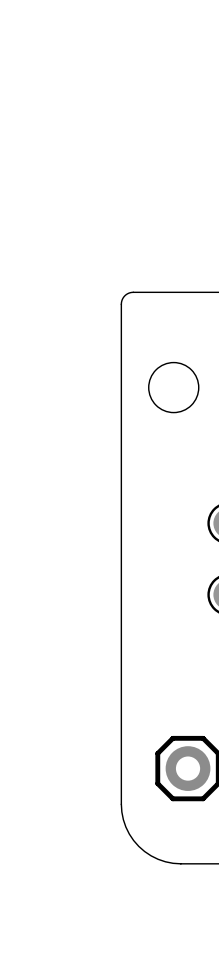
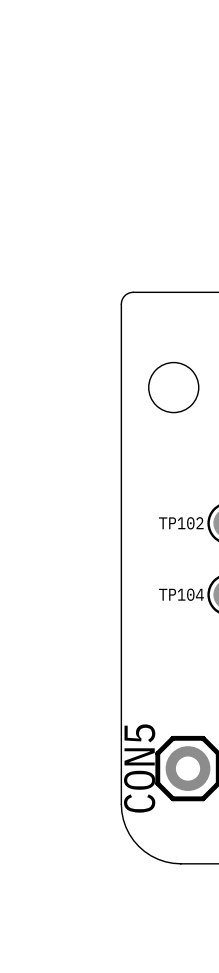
TP102 name: none -> TP102 (181, 523)
TP104 name: none -> TP104 (181, 594)
CON5 name: none -> CON5 (139, 768)

